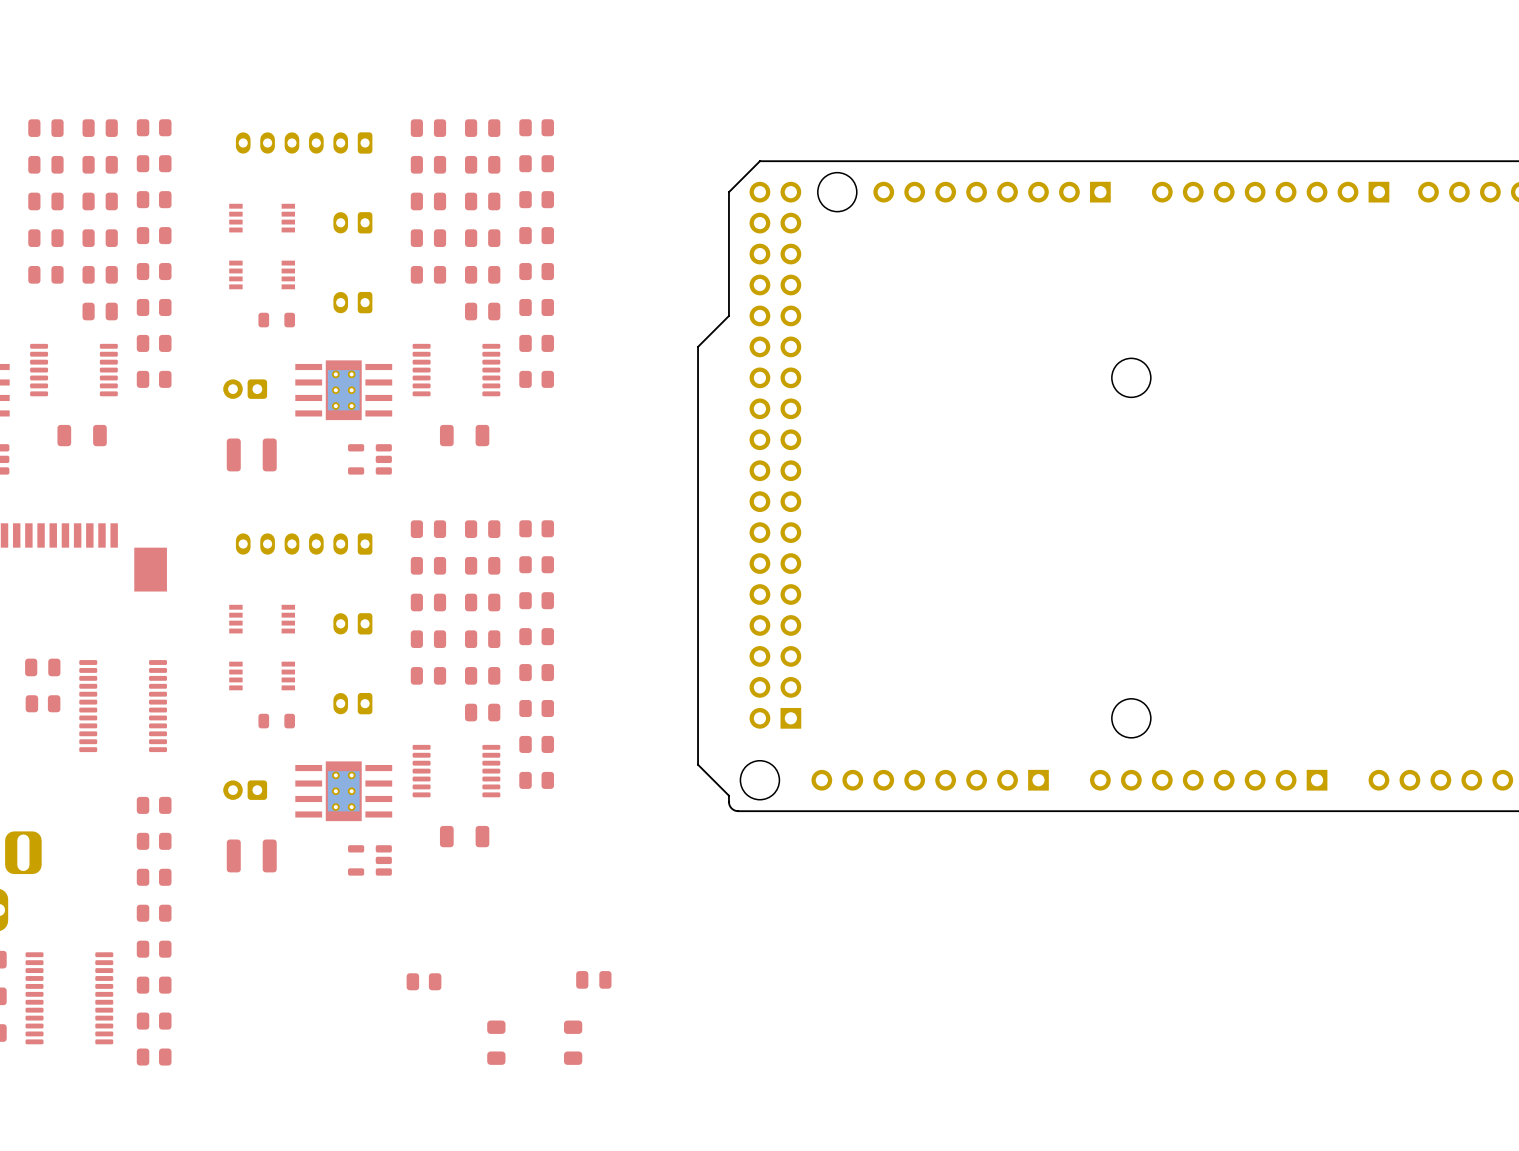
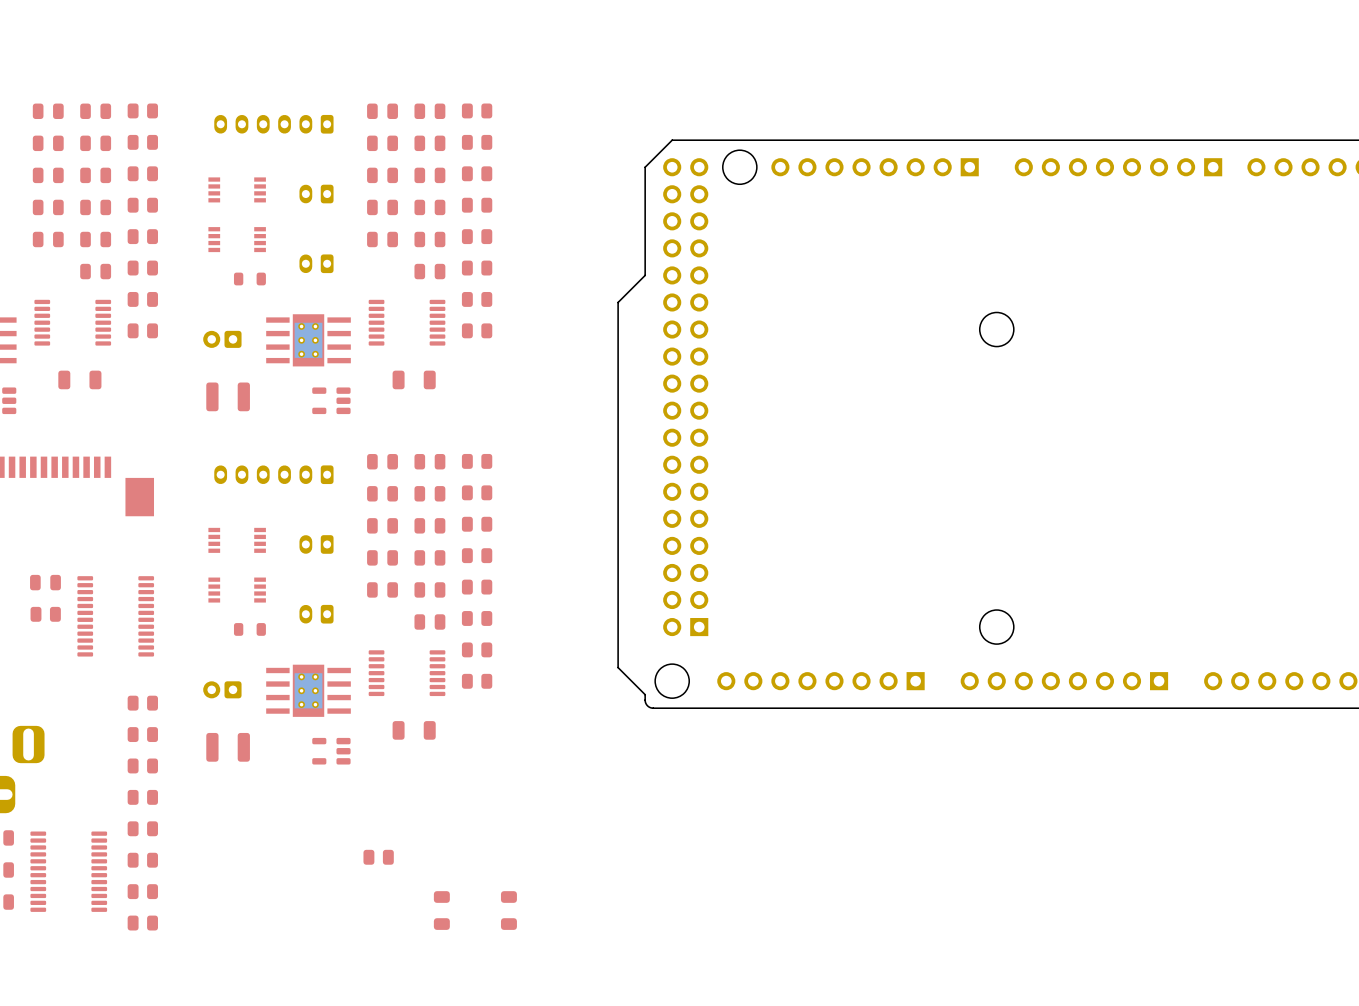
part: (593, 979) -> none

